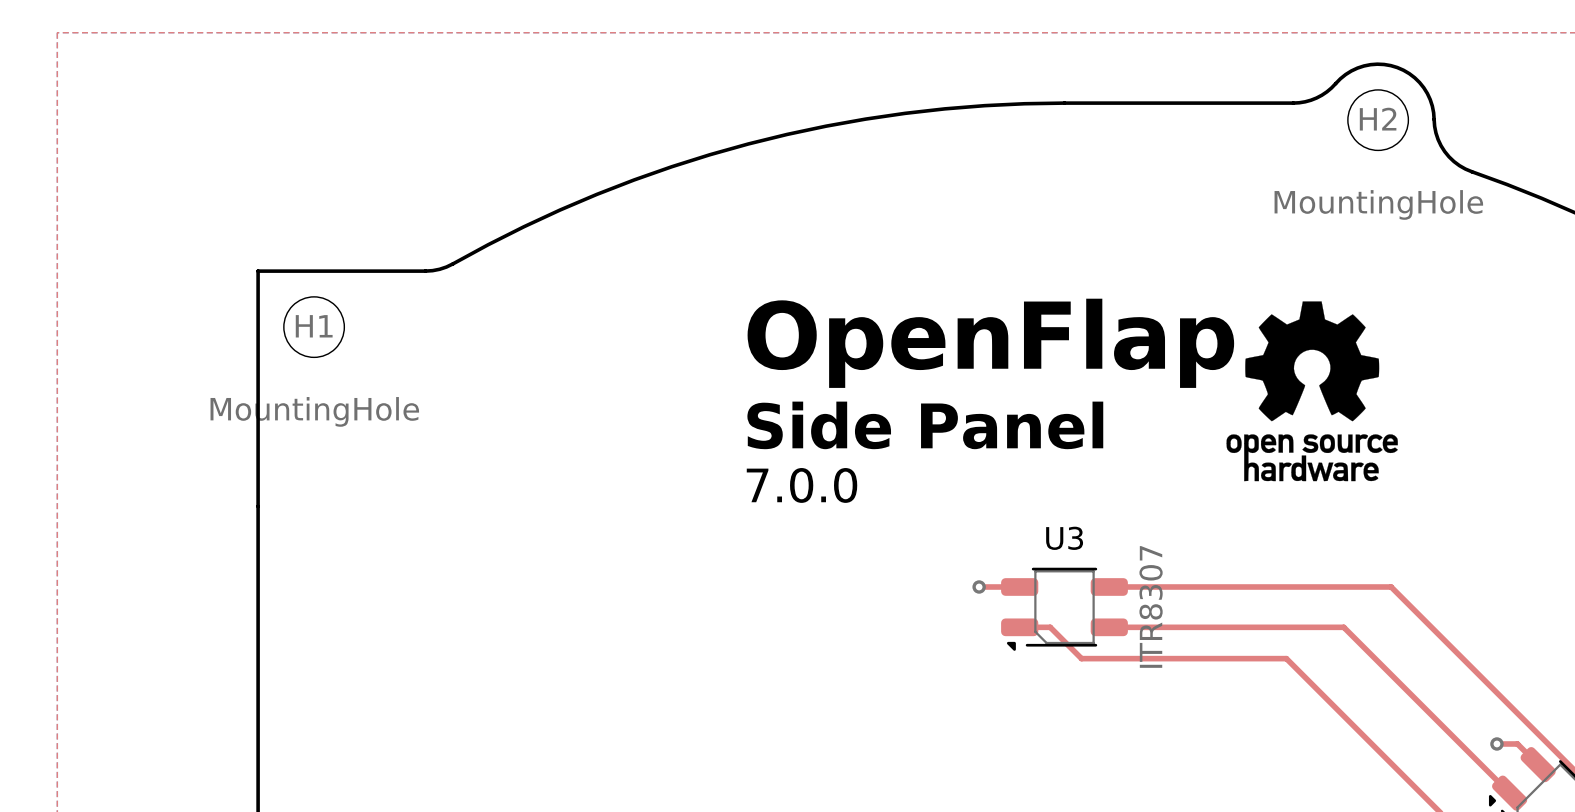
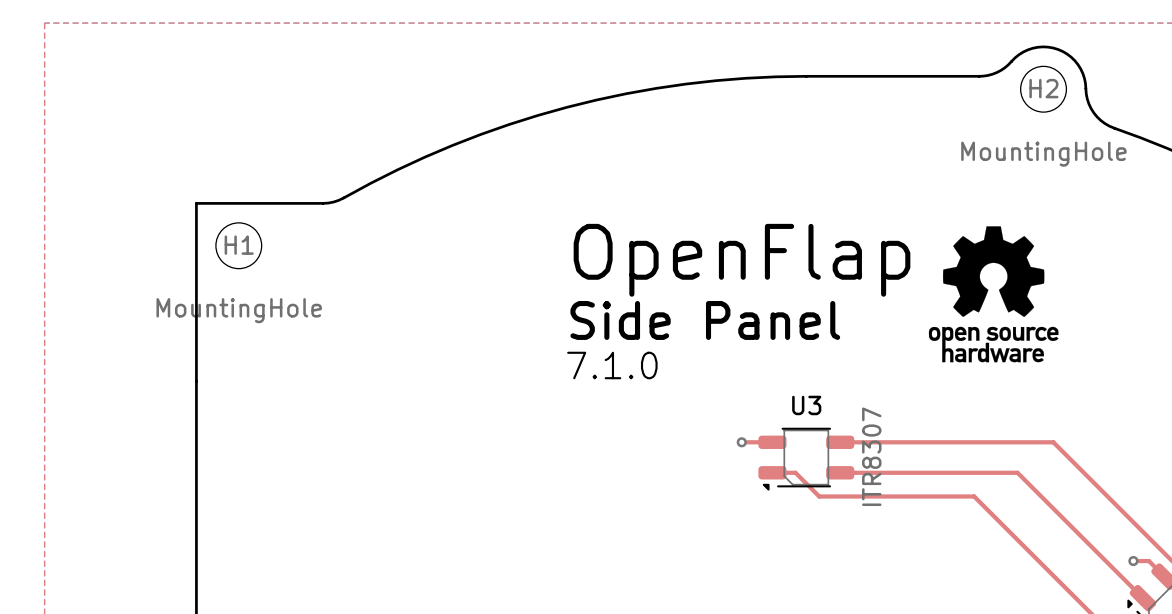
text: 7.0.0 (802, 485) -> 7.1.0 (612, 365)

